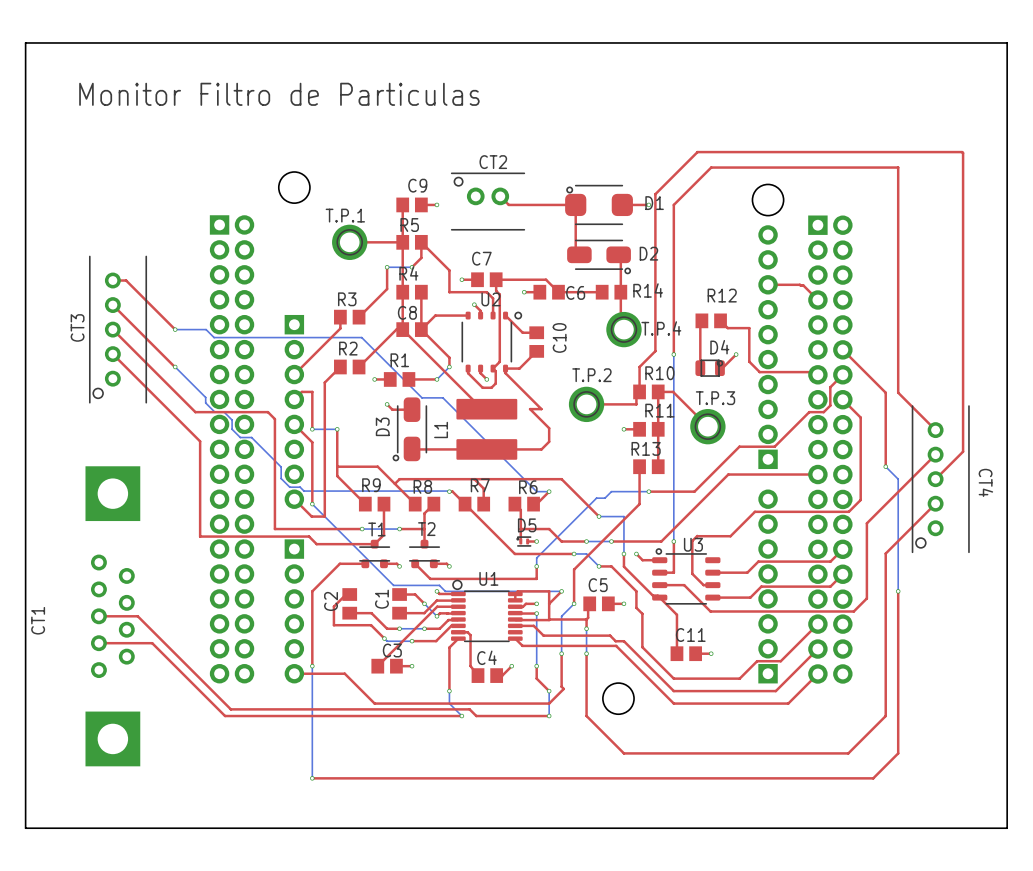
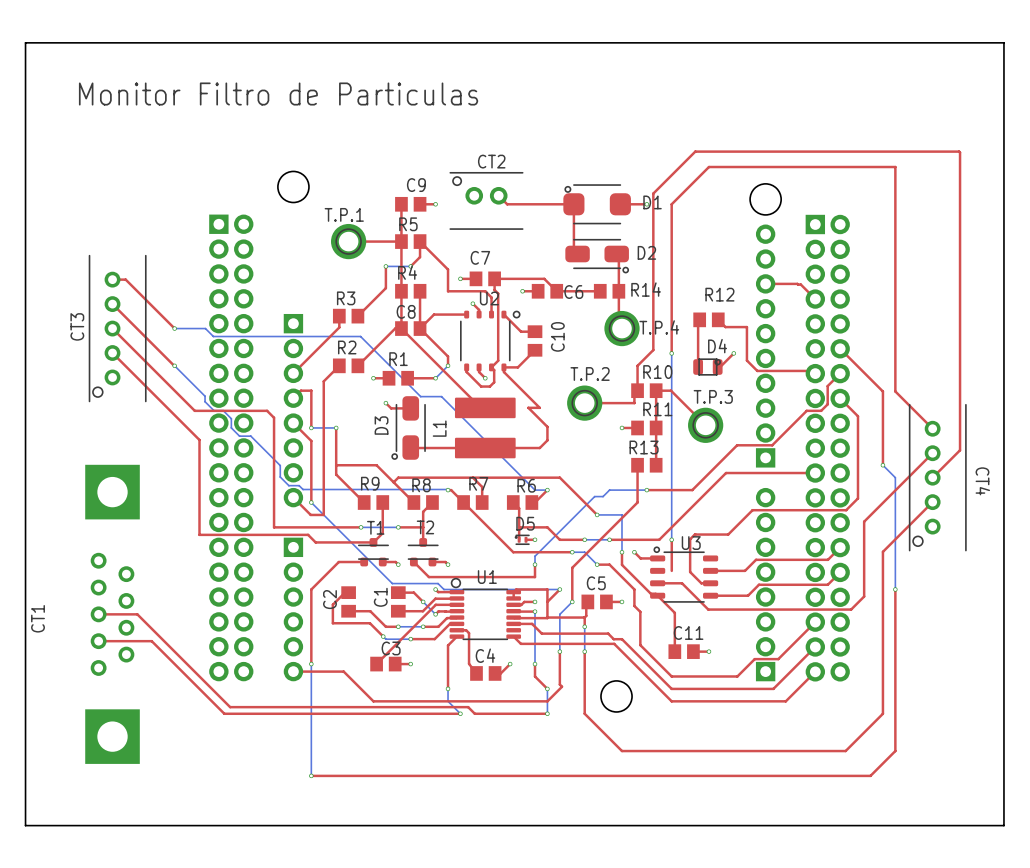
top track: (659, 572) (673, 572) -> none

